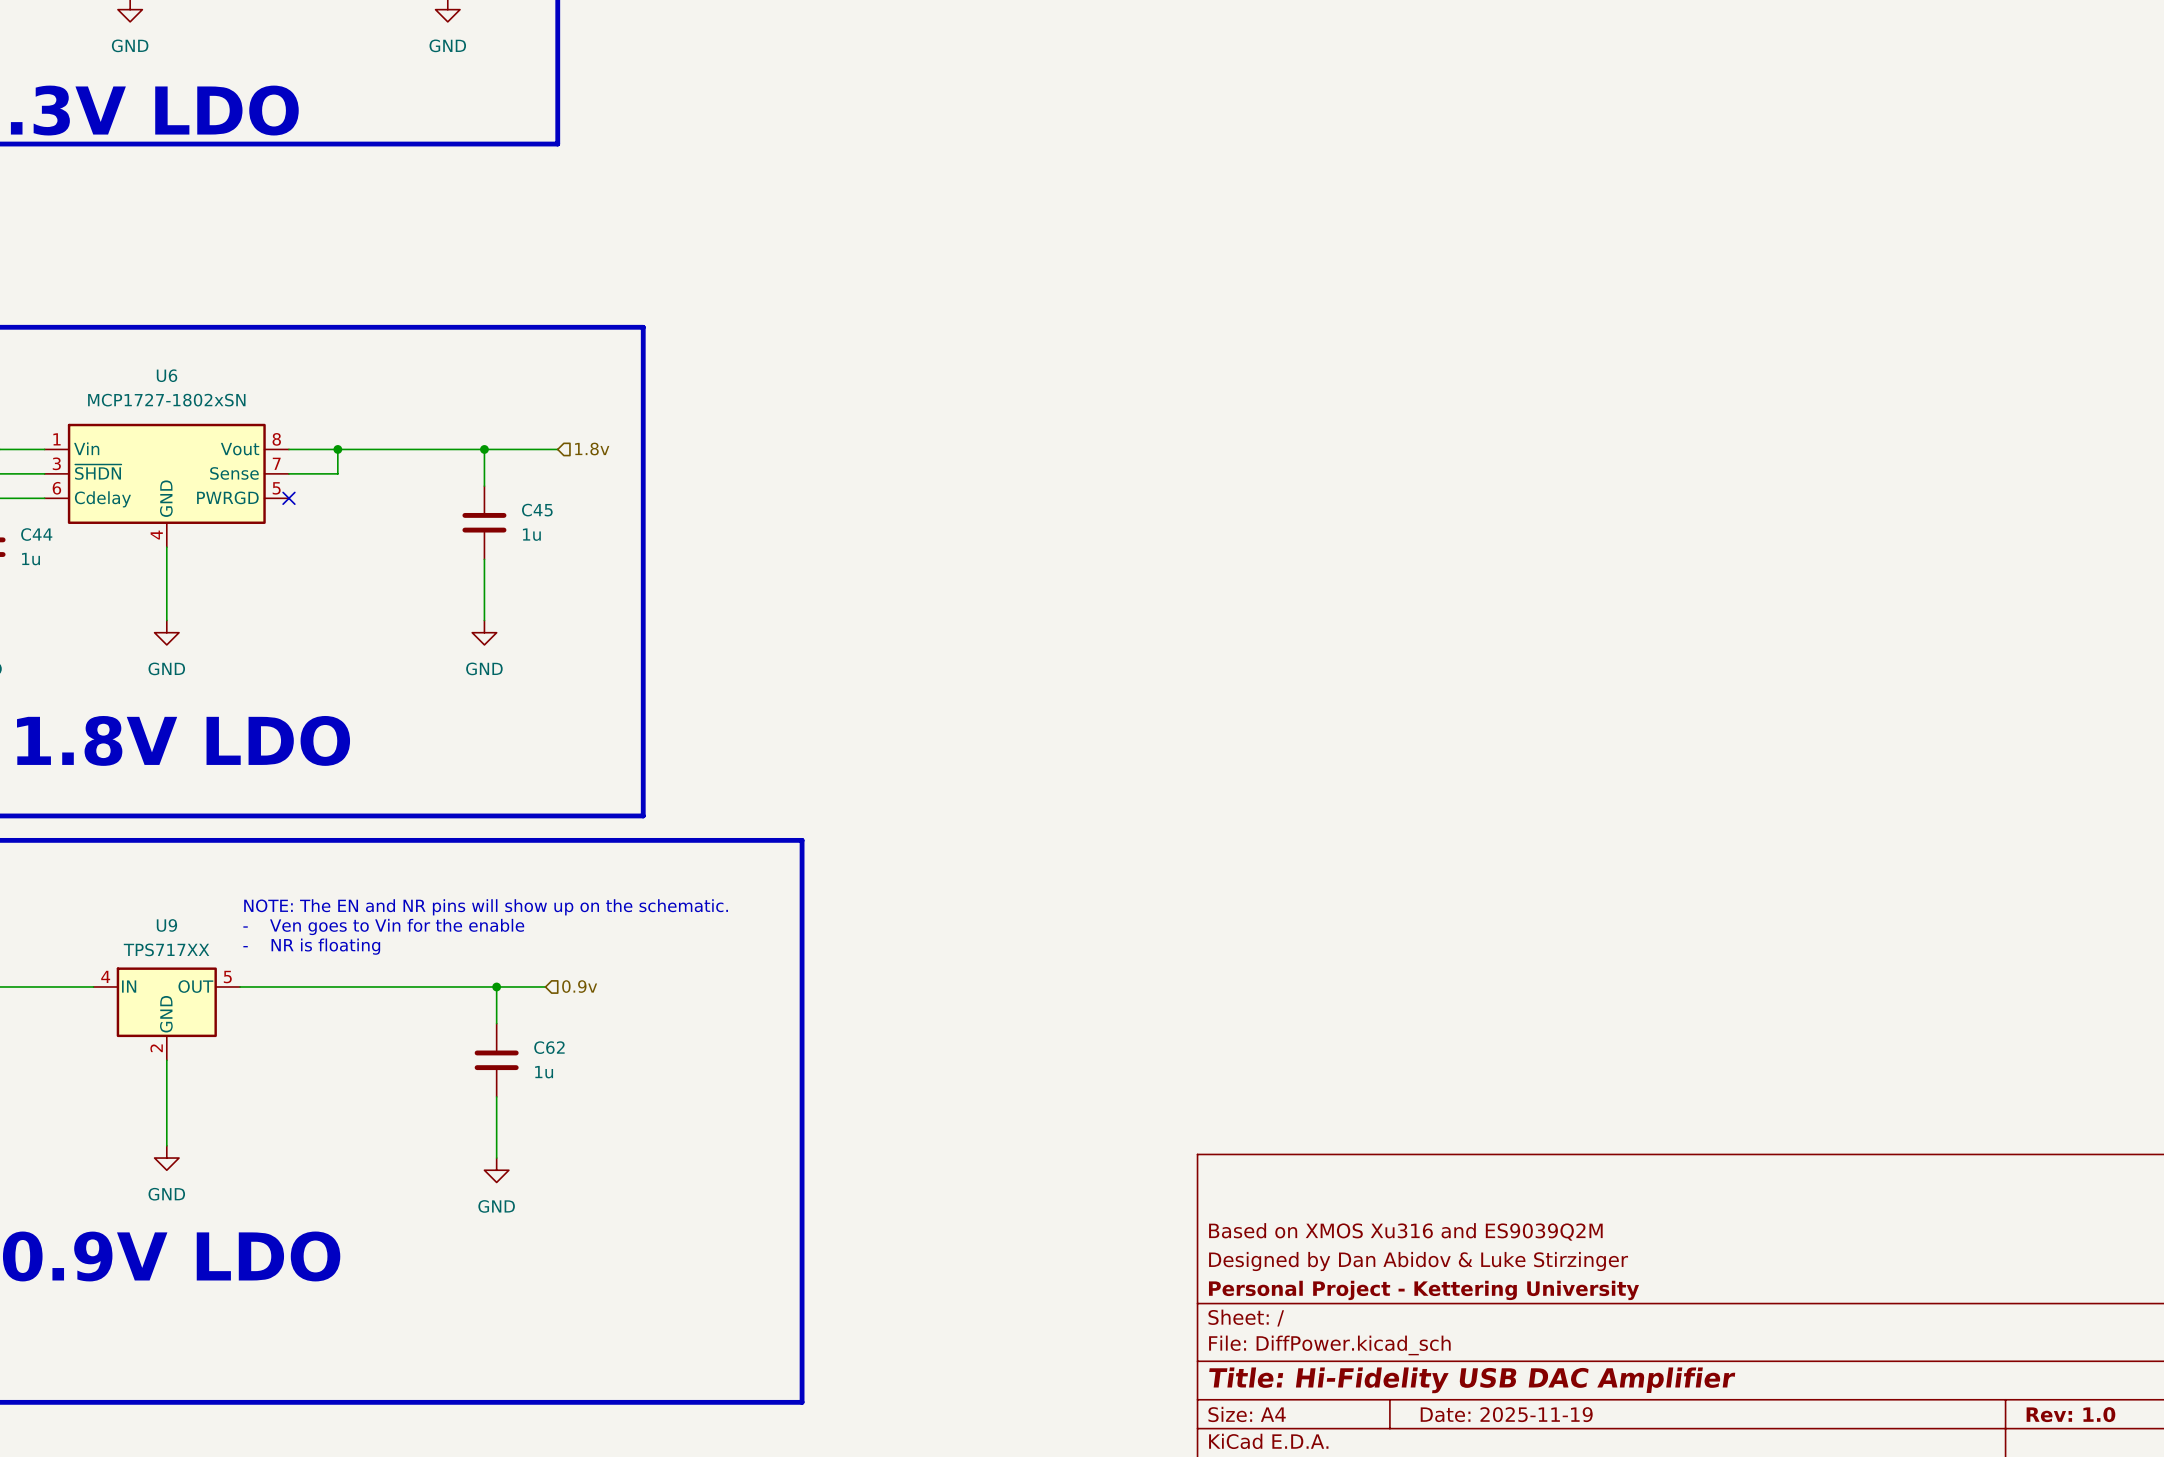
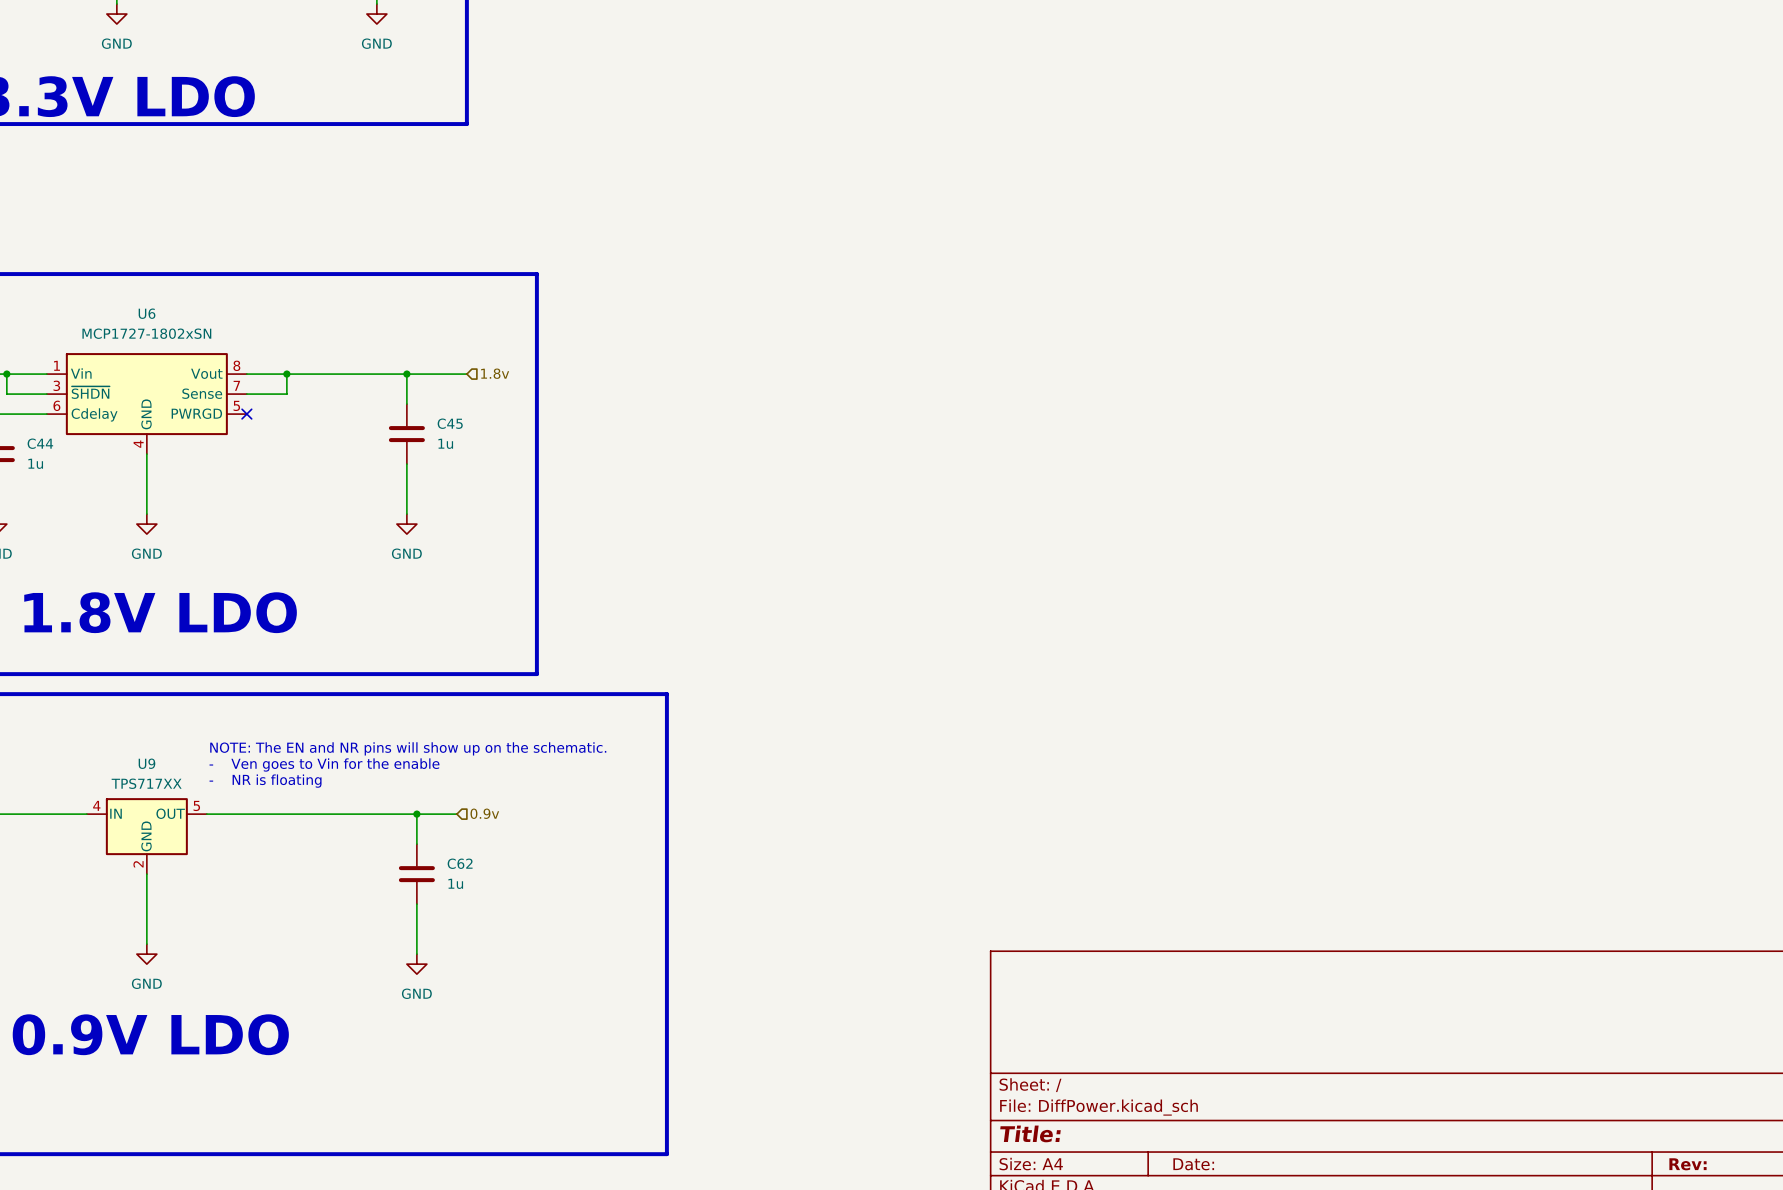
title block: Based on XMOS Xu316 and ES9039Q2M (1405, 1231) -> none
title block: Designed by Dan Abidov & Luke Stirzinger (1418, 1261) -> none
title block: Personal Project - Kettering University (1423, 1290) -> none
title block: Title: Hi-Fidelity USB DAC Amplifier (1472, 1380) -> Title: (1030, 1133)
title block: Date: 2025-11-19 (1506, 1414) -> Date: (1193, 1164)
title block: Rev: 1.0 (2070, 1414) -> Rev: (1687, 1164)

